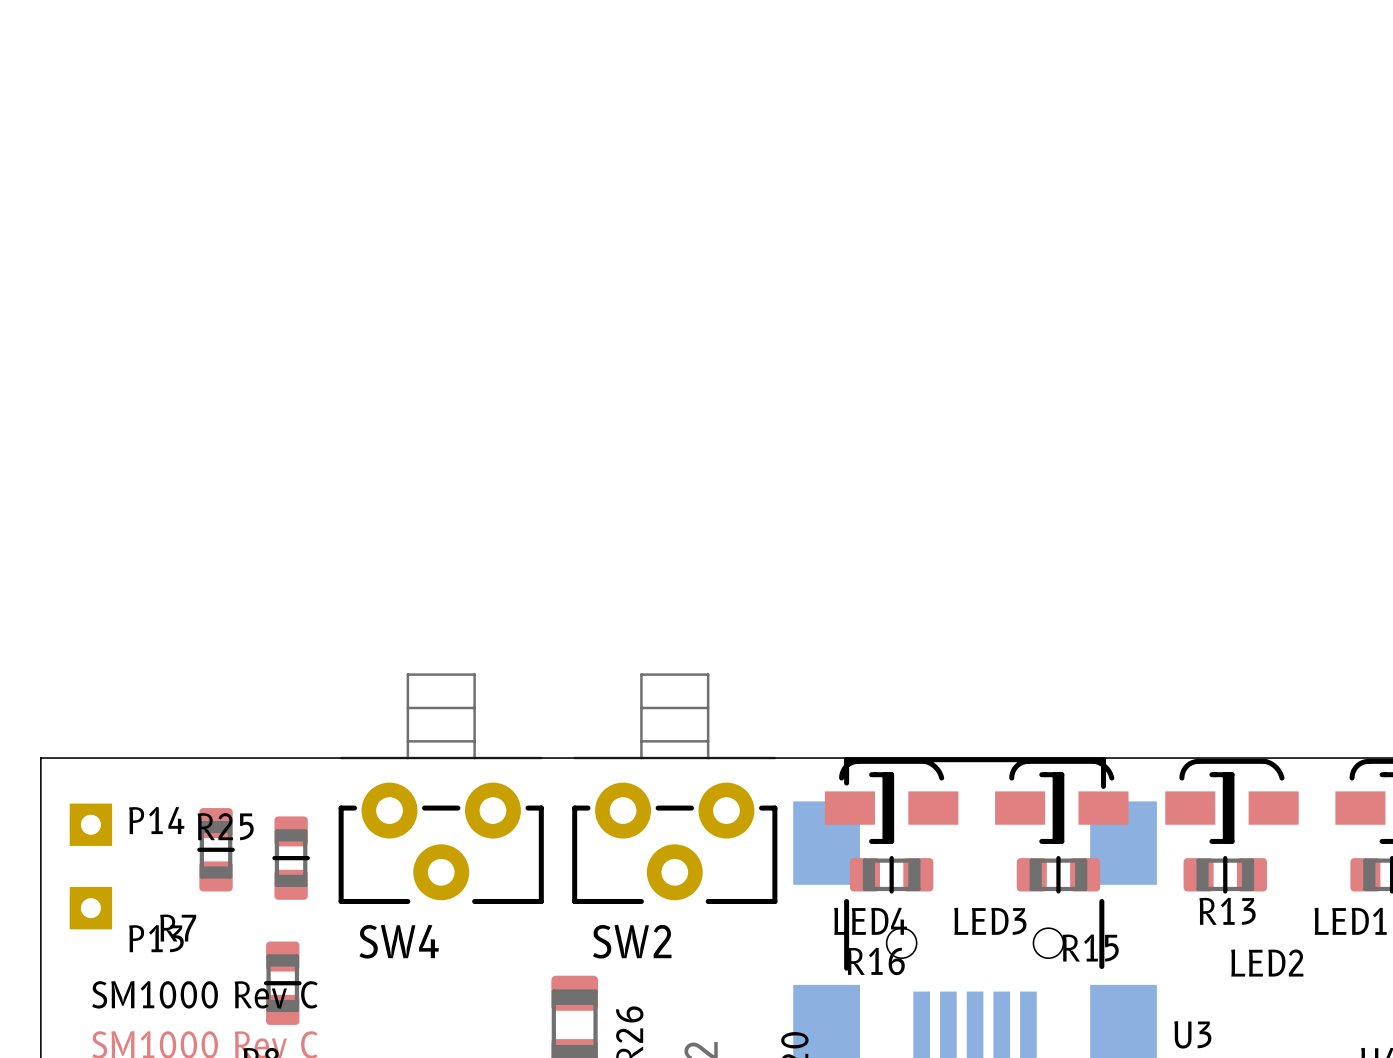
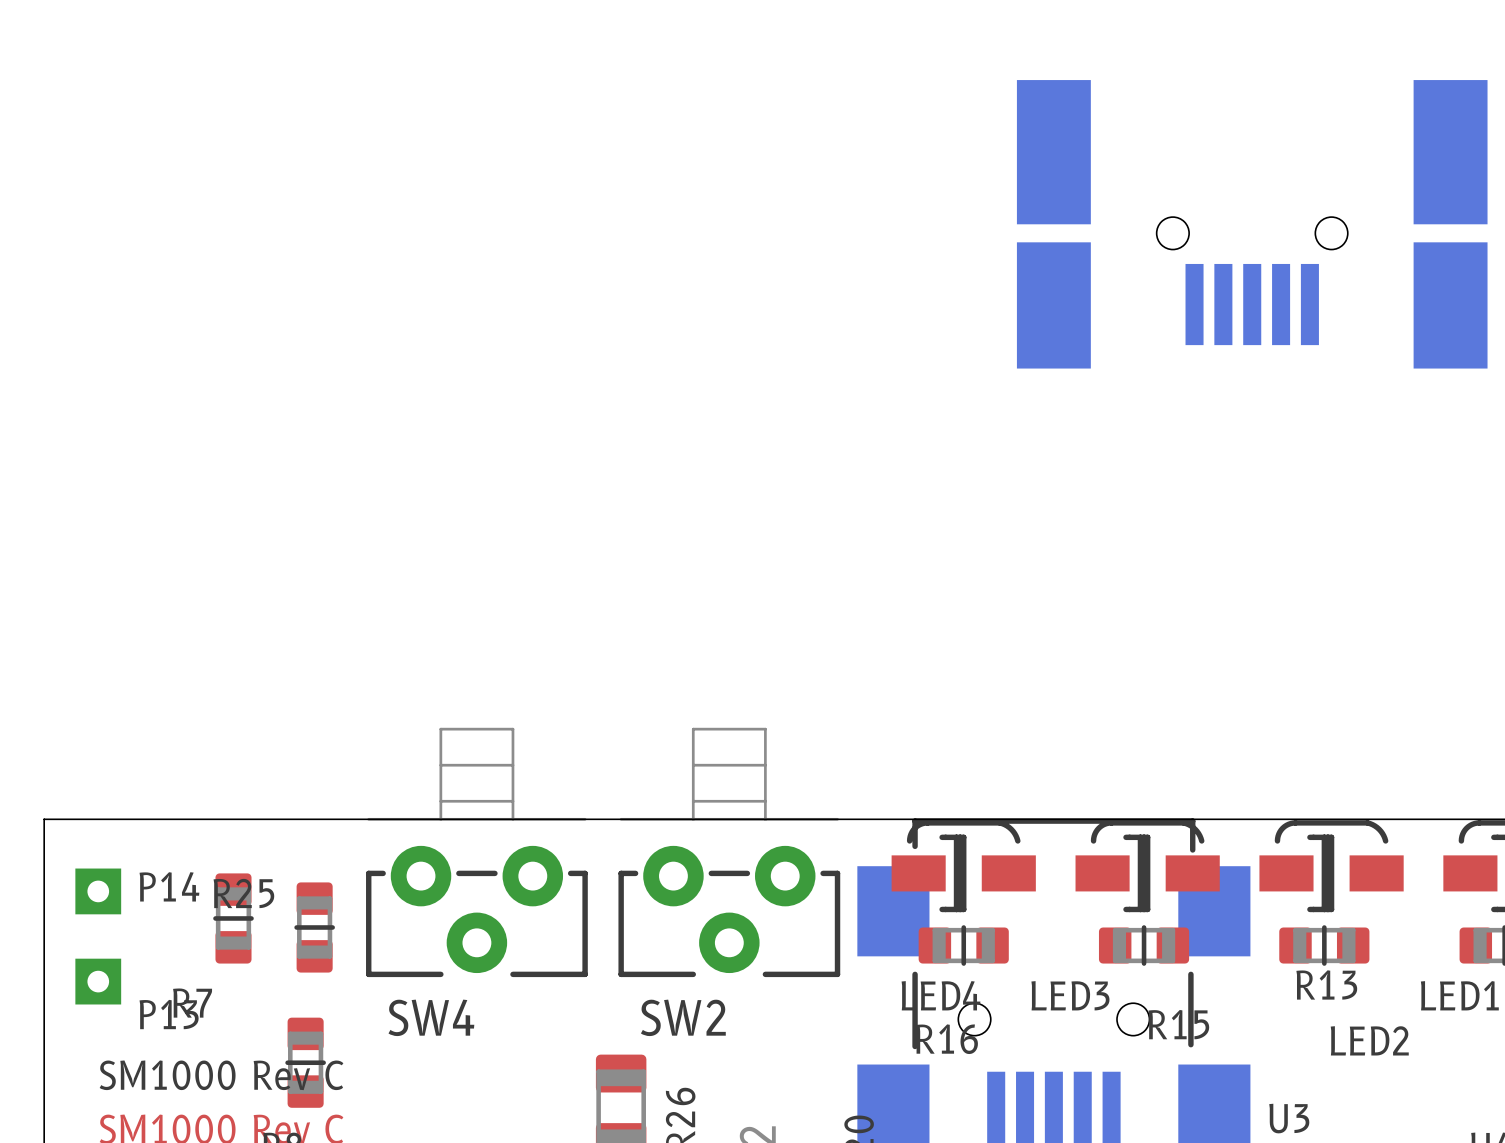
part: none -> (1252, 224)

